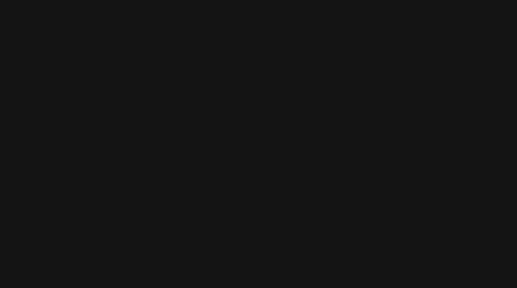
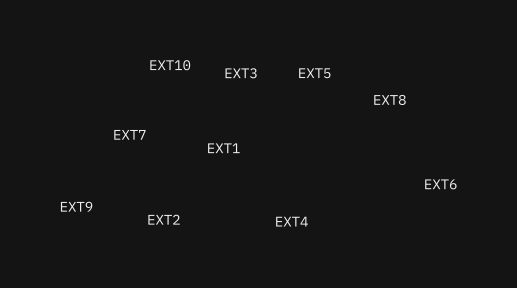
EXT10: none -> (170, 65)
EXT3: none -> (241, 73)
EXT5: none -> (314, 73)
EXT8: none -> (389, 99)
EXT7: none -> (129, 134)
EXT1: none -> (223, 148)
EXT6: none -> (440, 184)
EXT9: none -> (76, 206)
EXT2: none -> (164, 219)
EXT4: none -> (292, 221)

